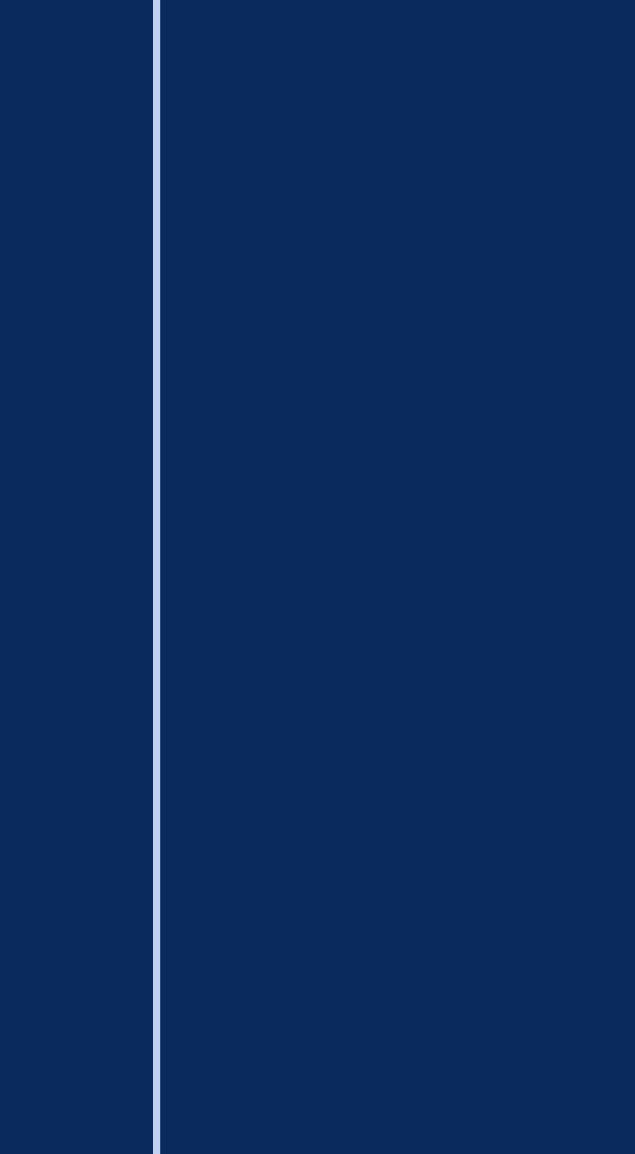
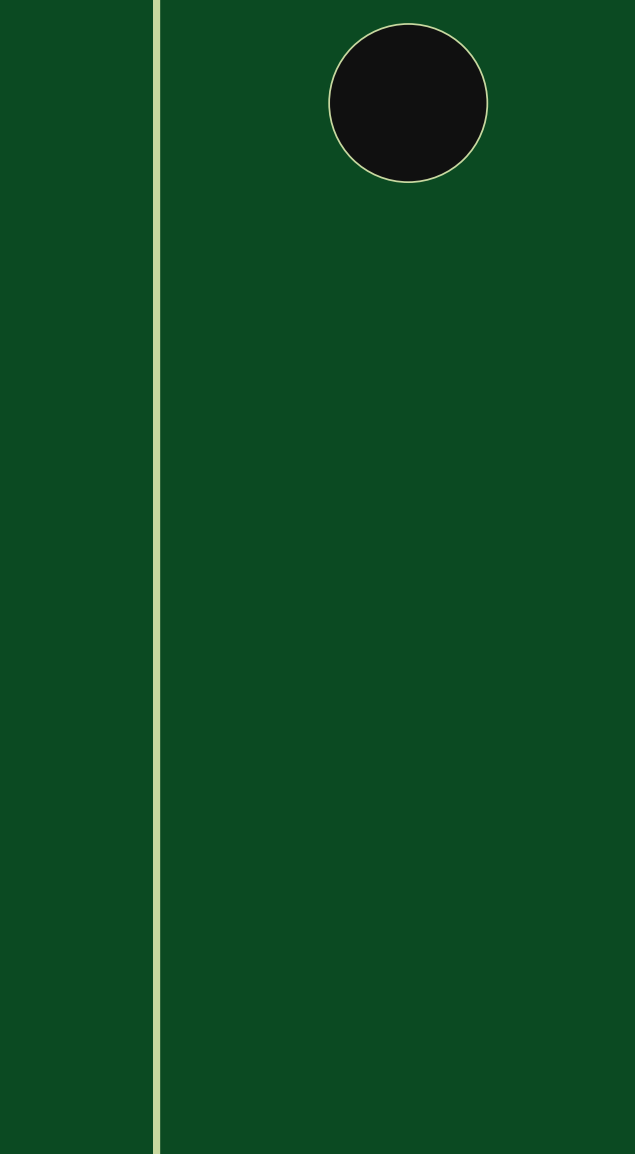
part: none -> (408, 103)

